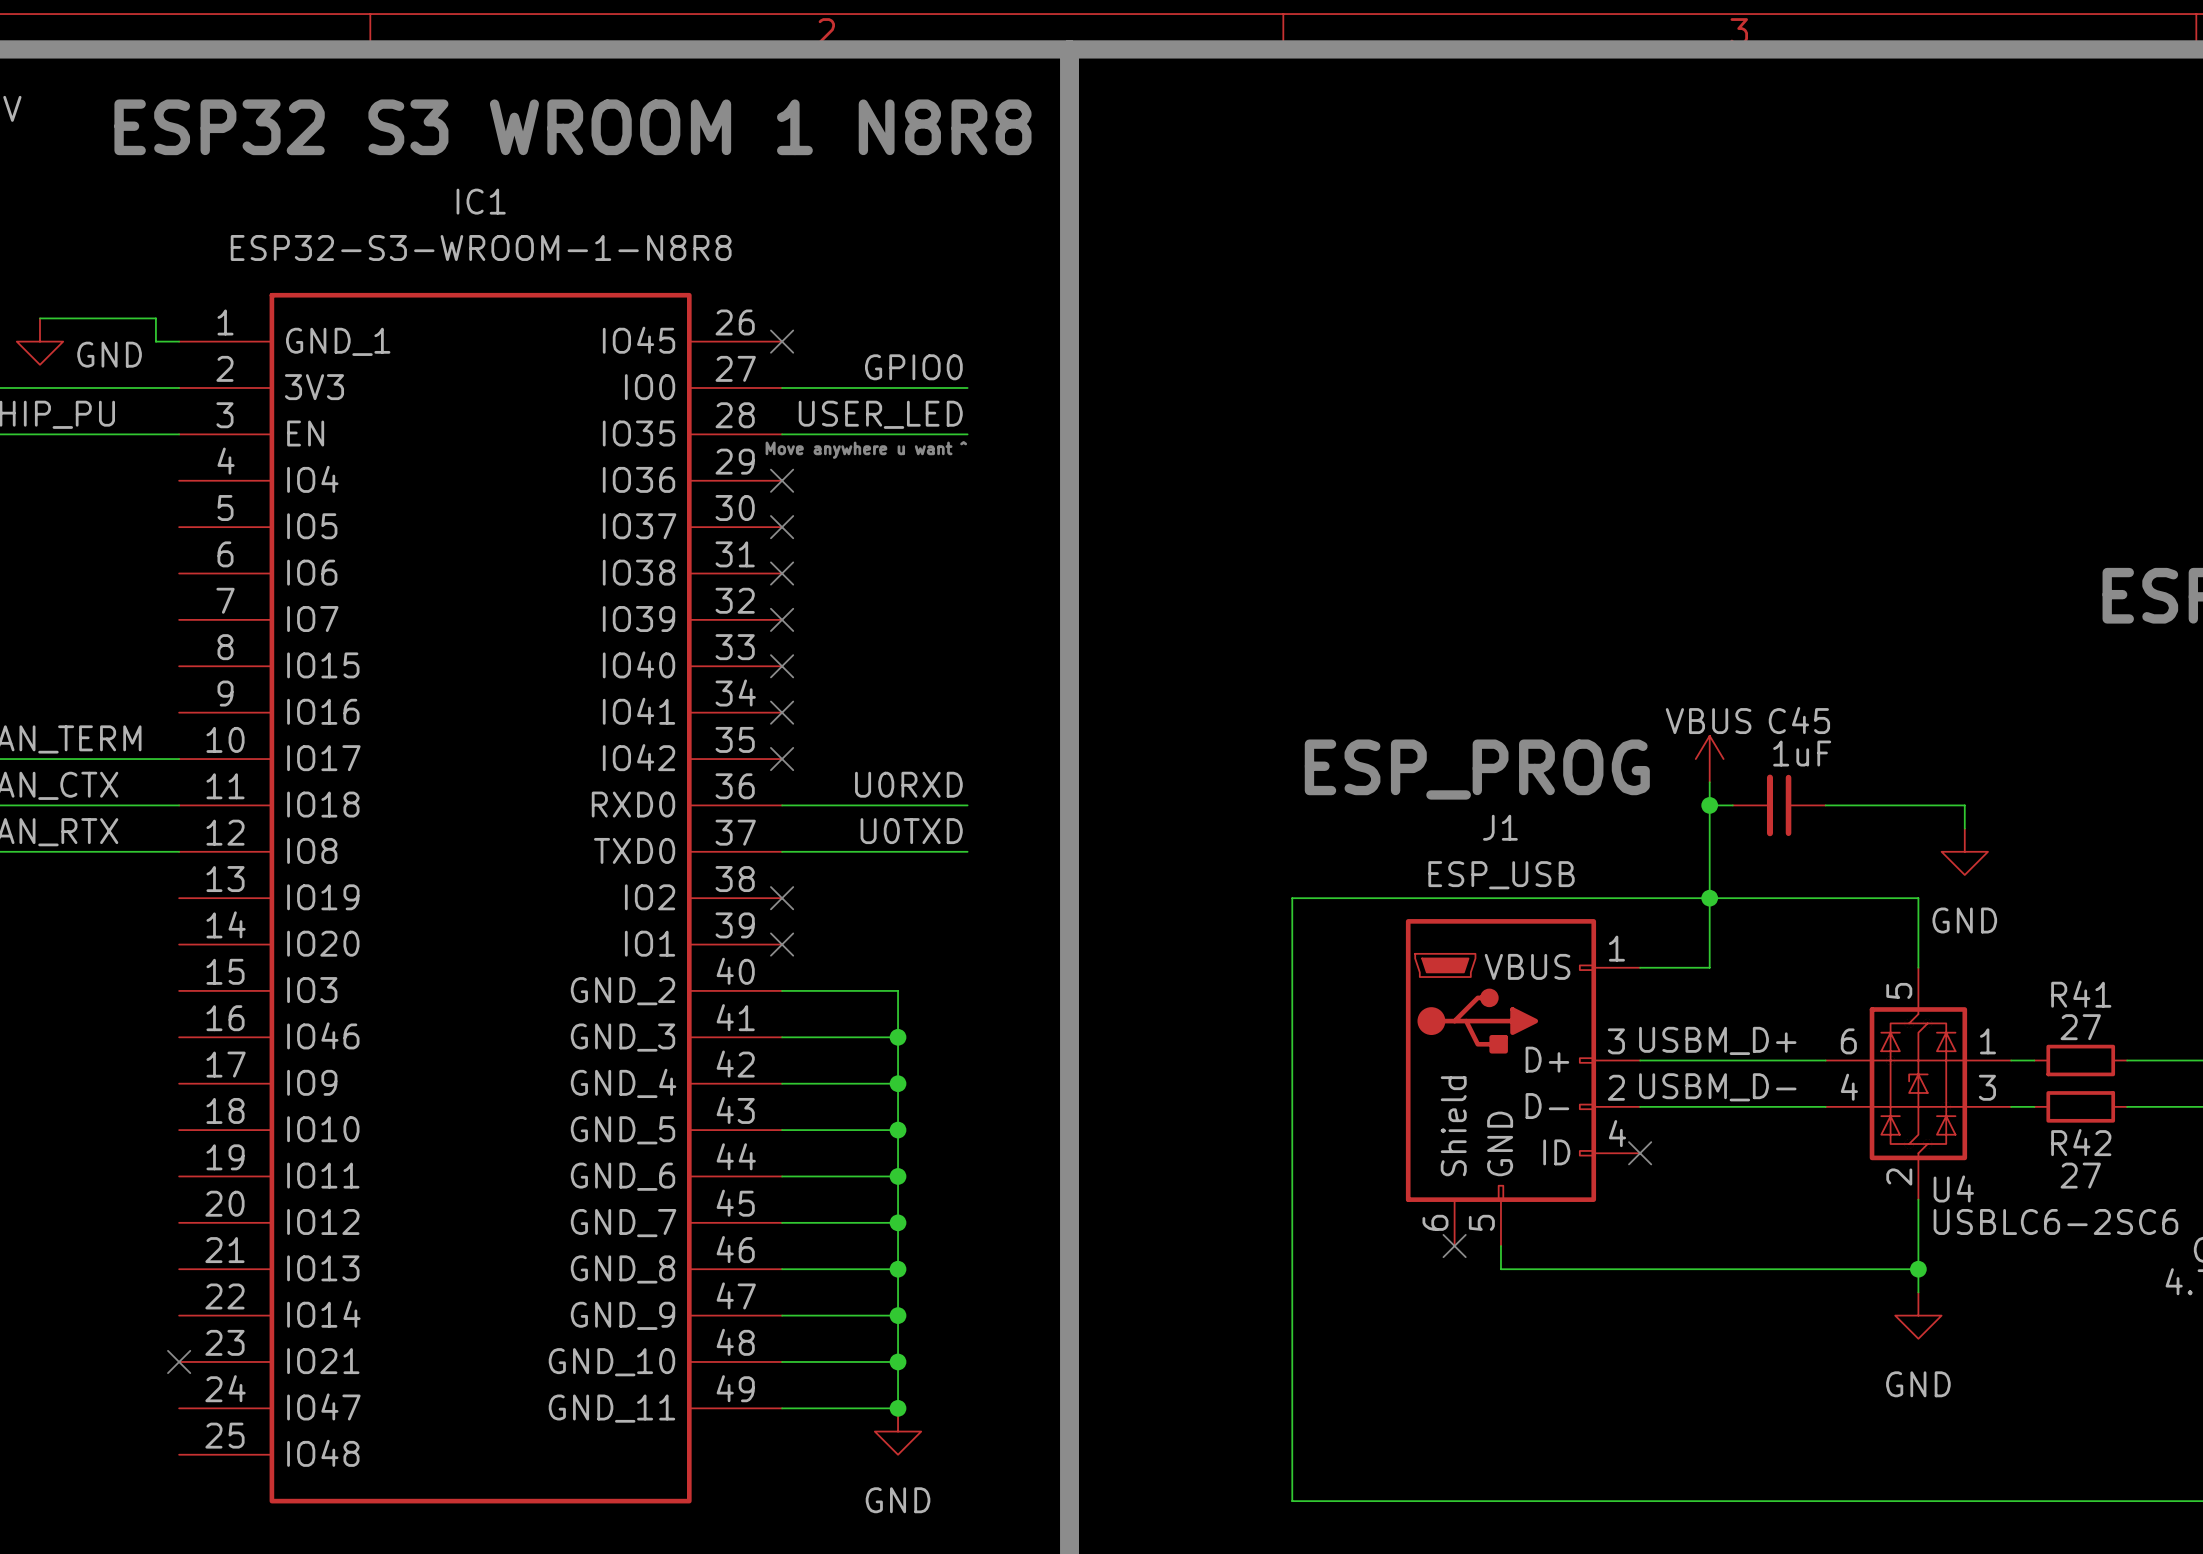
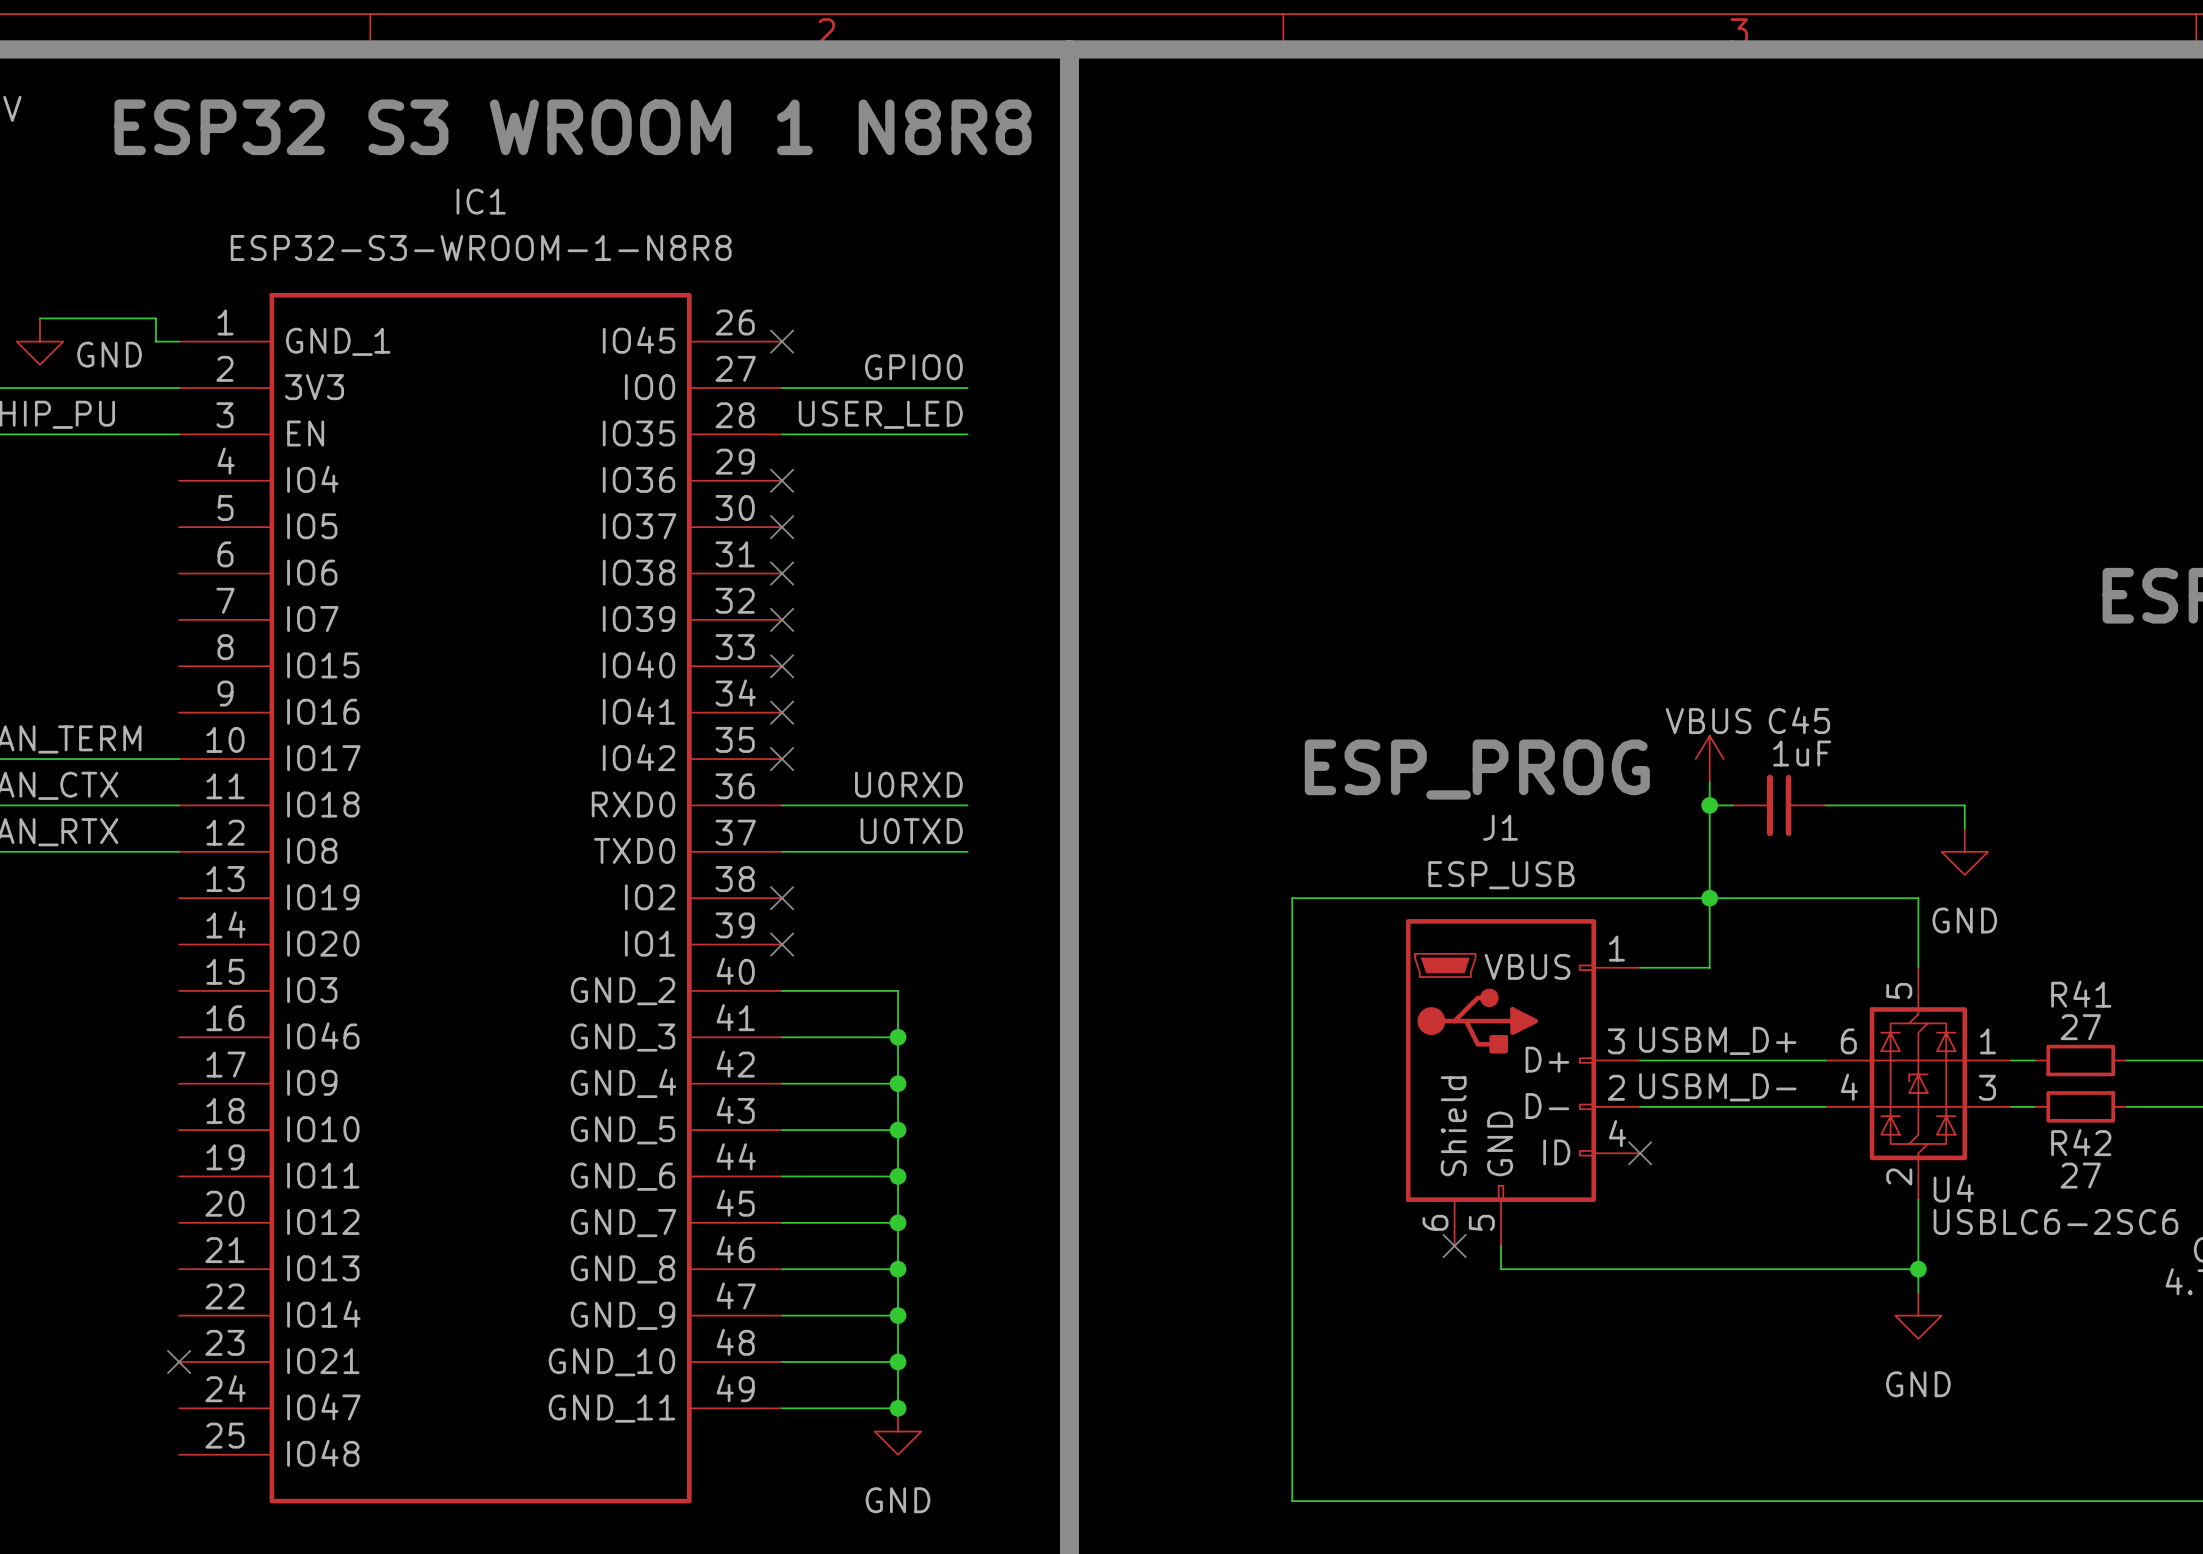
text: Move anywhere u want ^ (866, 449) -> none

